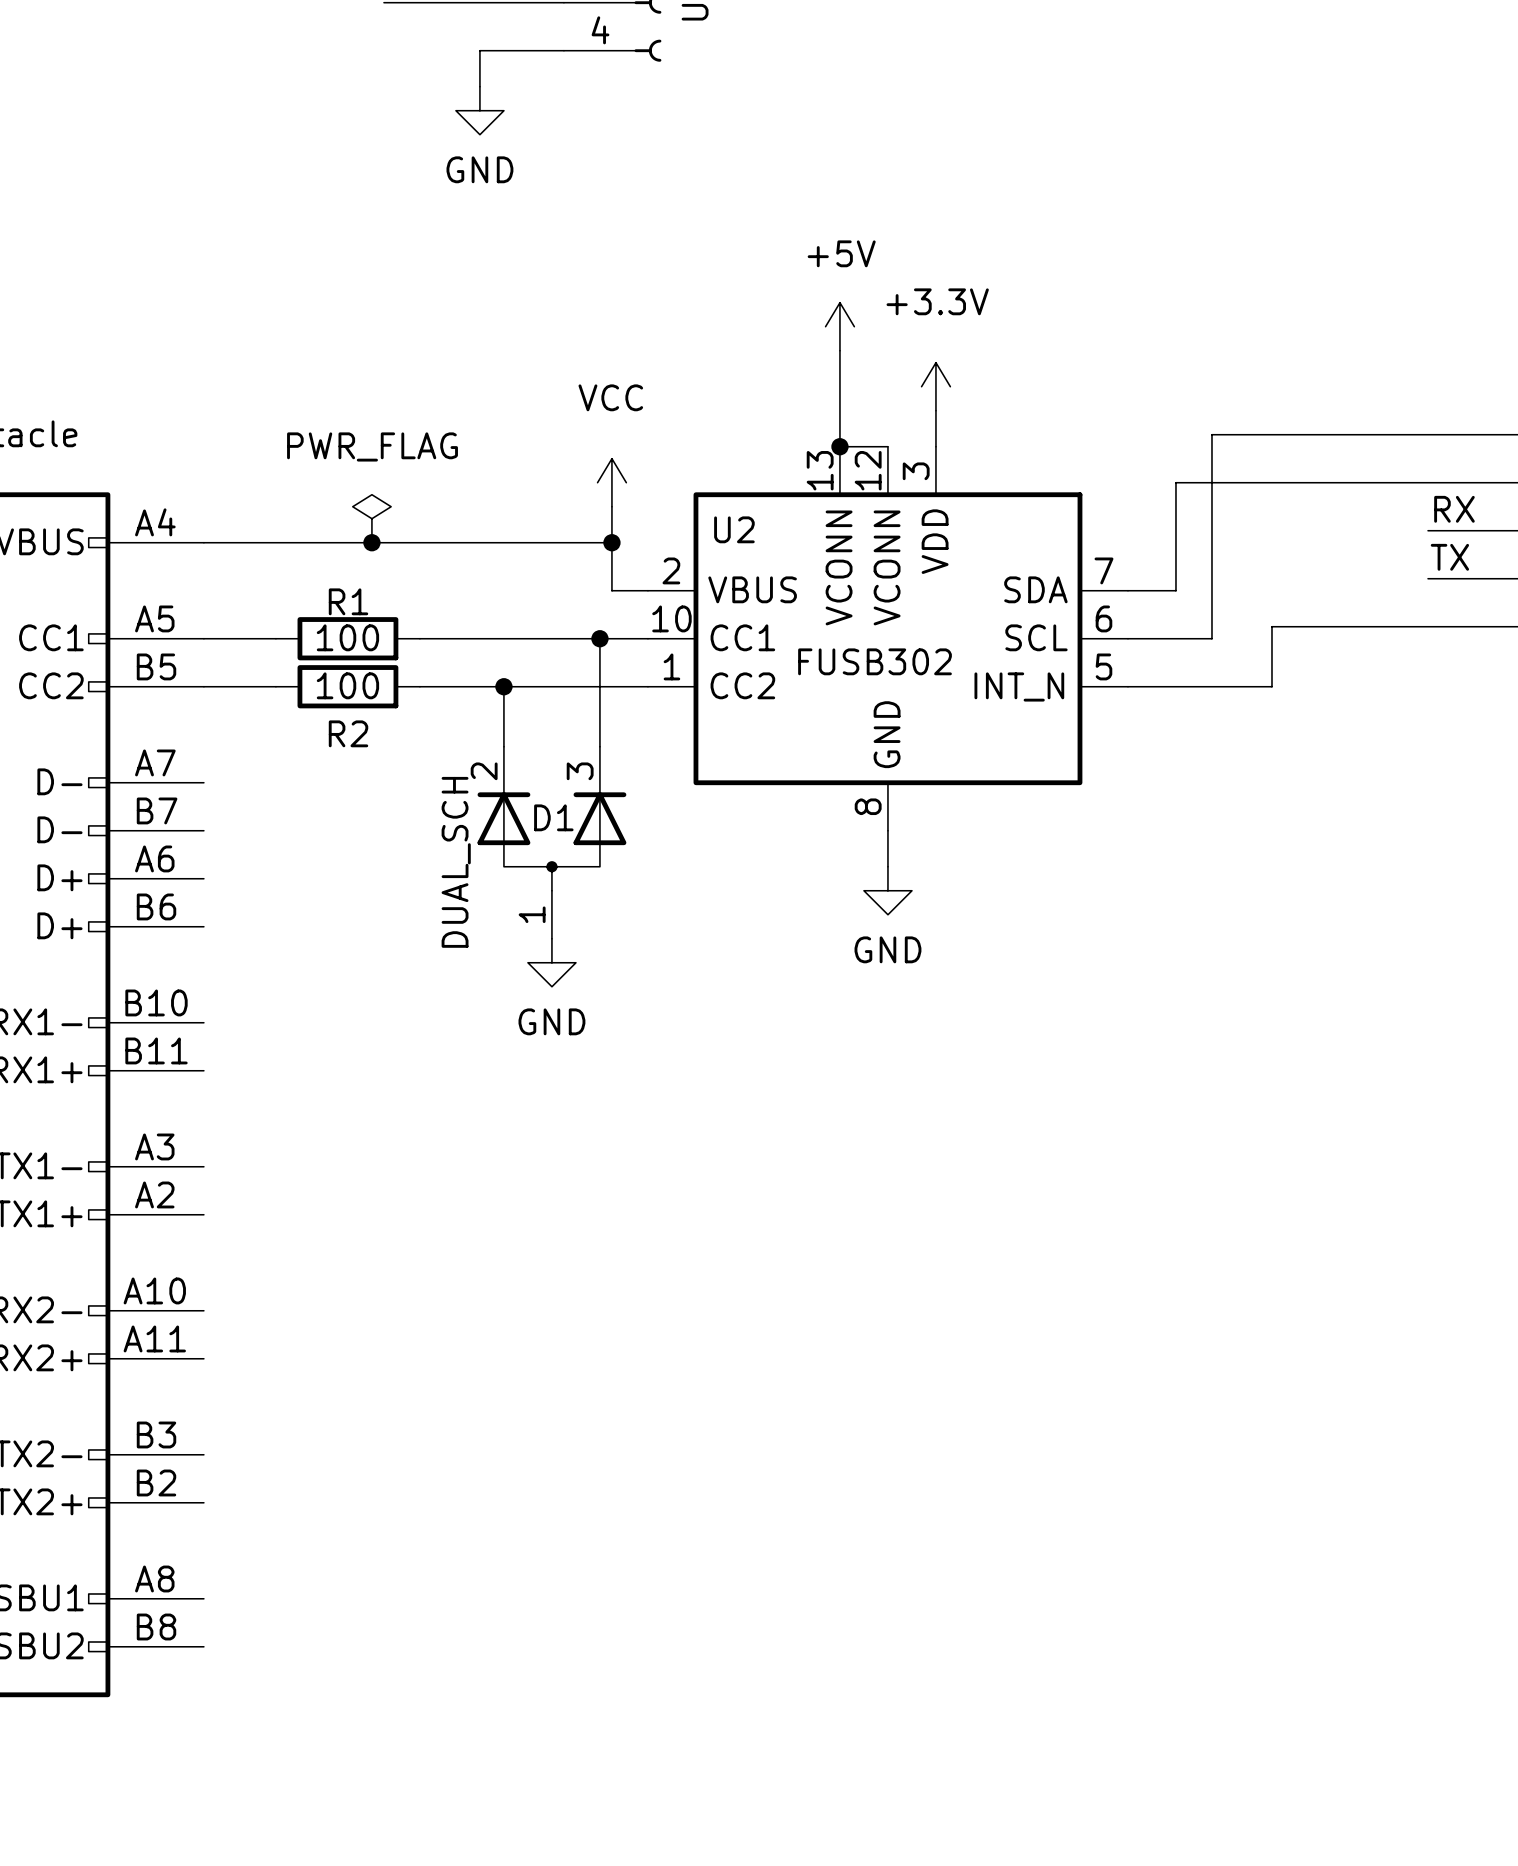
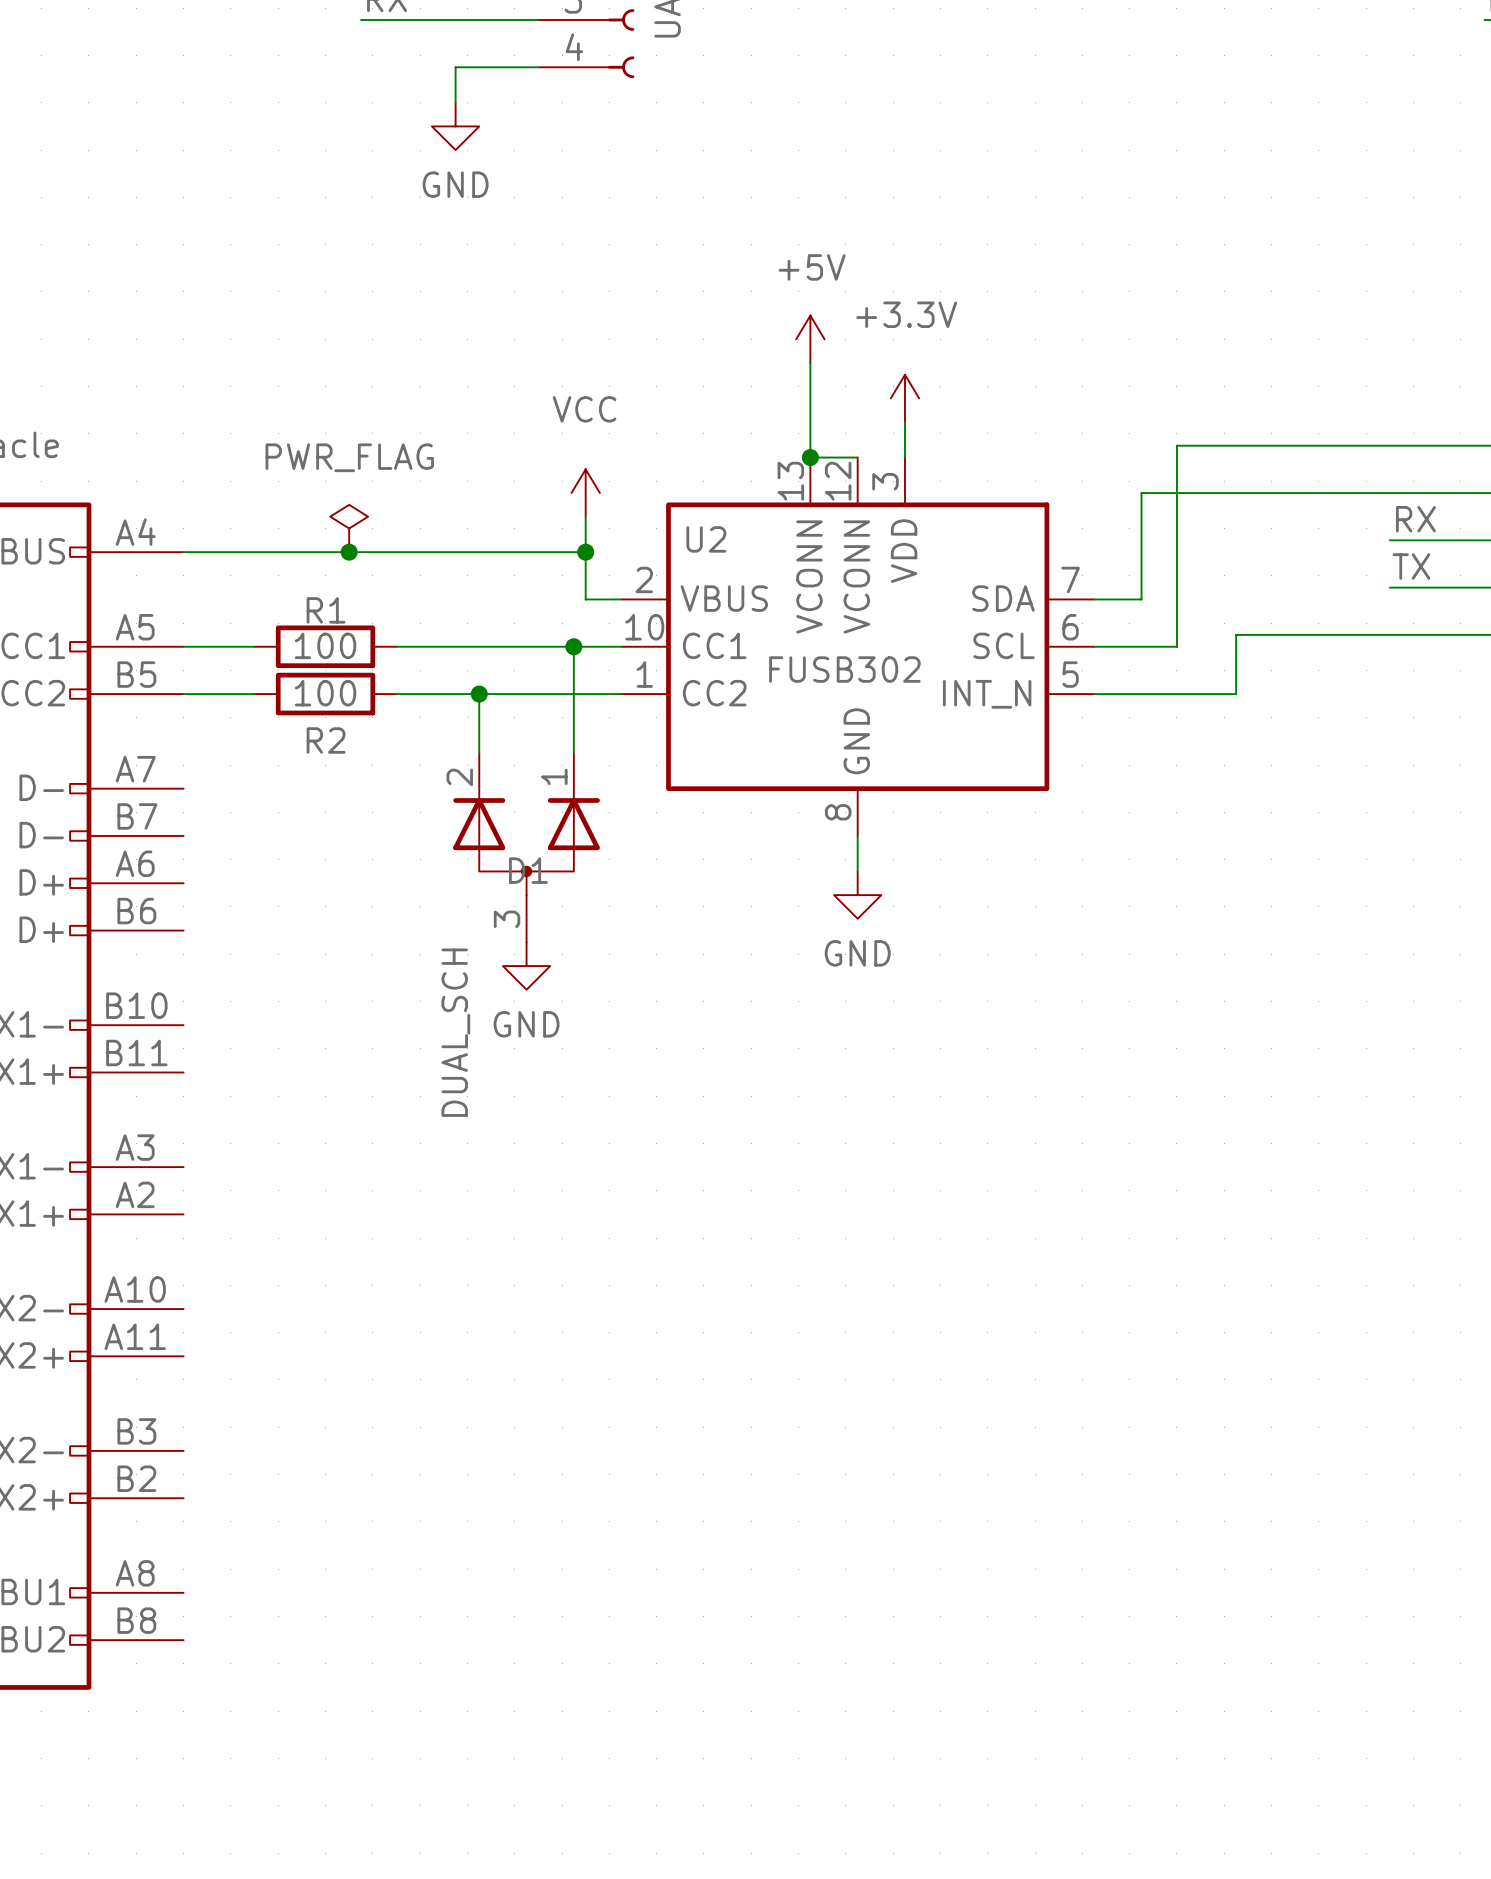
D1 pin number: 3 (580, 771) -> 1 (554, 776)
D1 name position: D1 (553, 817) -> D1 (528, 870)
D1 value position: DUAL_SCH (456, 862) -> DUAL_SCH (455, 1032)
D1 pin number: 1 (532, 914) -> 3 (507, 919)

